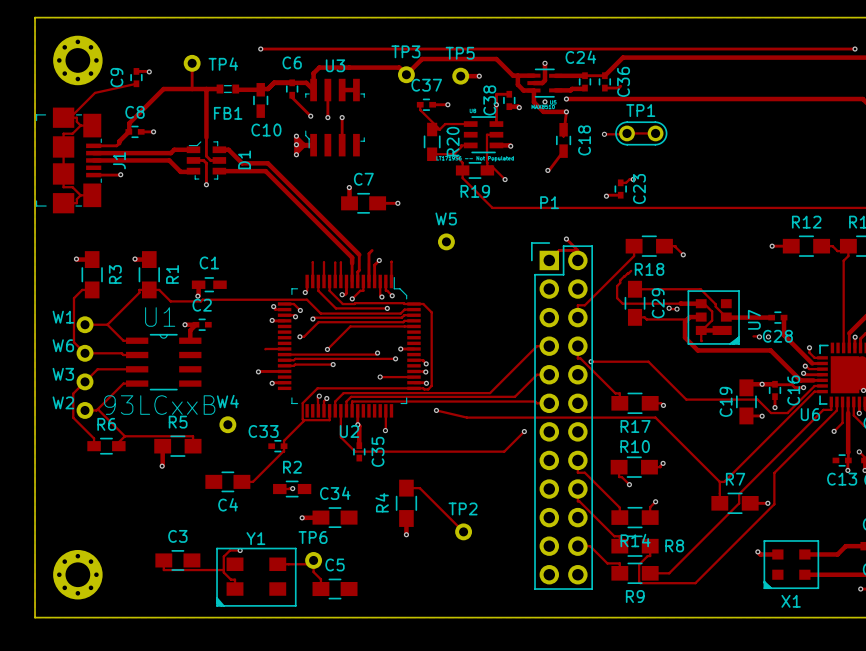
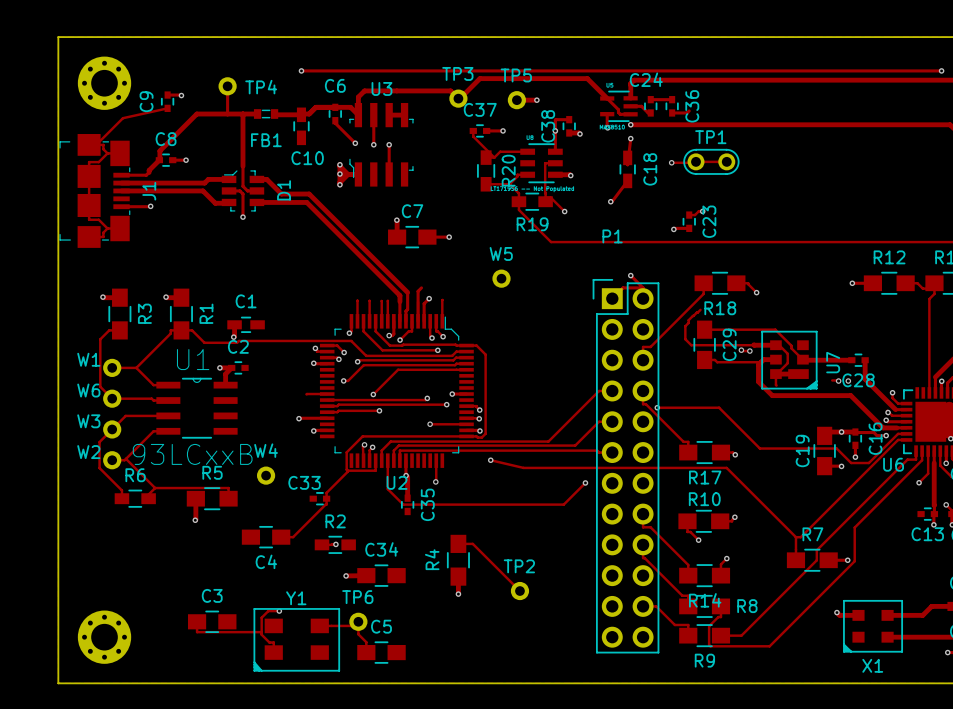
track: (622, 57) (604, 75) -> (691, 80) (634, 80) (630, 83) (630, 98)
track: (545, 63) (545, 80) (542, 83) (533, 83) -> none
via: (545, 63) -> none
track: (406, 74) (422, 59) (496, 59) (513, 75) (533, 75) -> none
track: none -> (459, 98) (479, 78) (587, 78) (618, 109) (620, 114) (630, 114)
track: (517, 75) (517, 84) (523, 90) (533, 90) (533, 102) (543, 111) (566, 111) -> none
track: (555, 75) (584, 75) -> none
track: none -> (630, 106) (641, 106) (648, 112)
part rotation: 0° (544, 83) -> 180° (618, 106)
track: (585, 88) (555, 90) -> none
track: none -> (607, 114) (607, 127)

